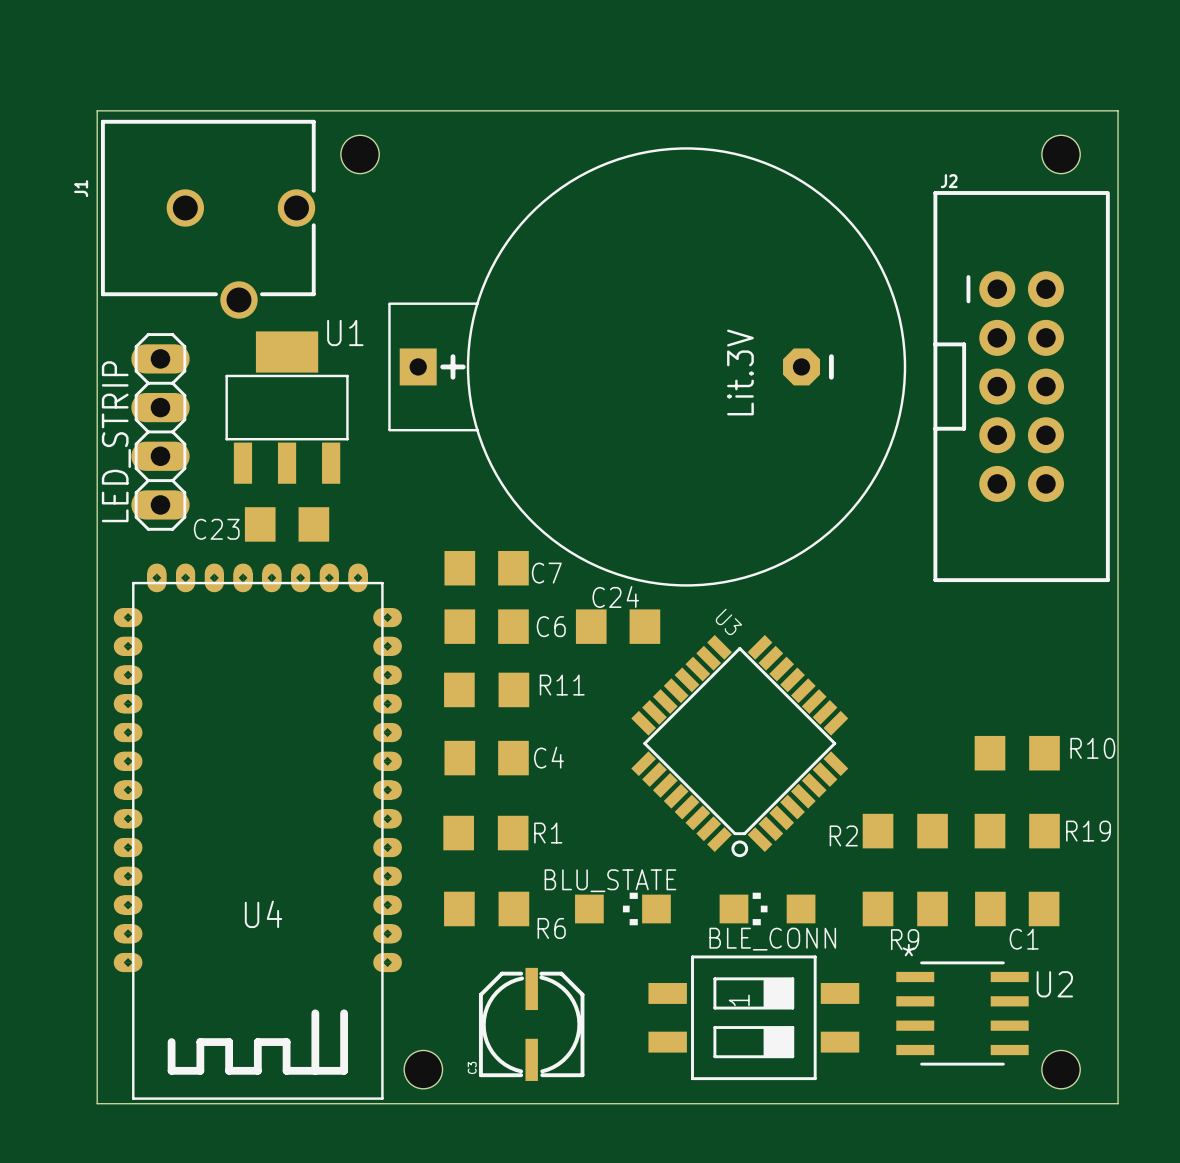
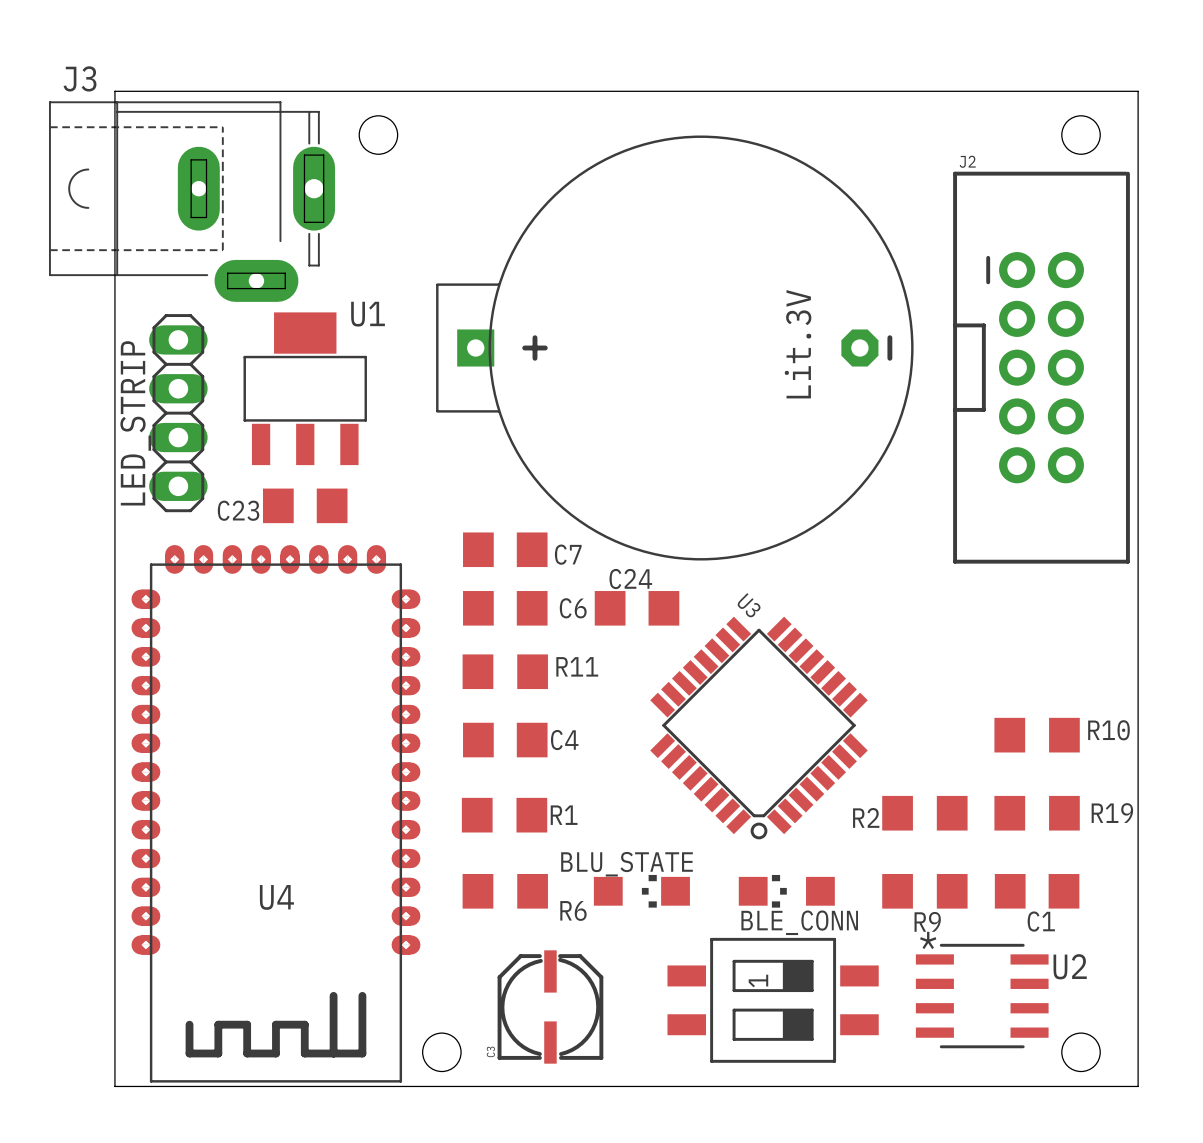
part footprint: [388, 147, 907, 587] -> [436, 135, 914, 561]
J1: (208, 219) -> none
J3: none -> (192, 201)

